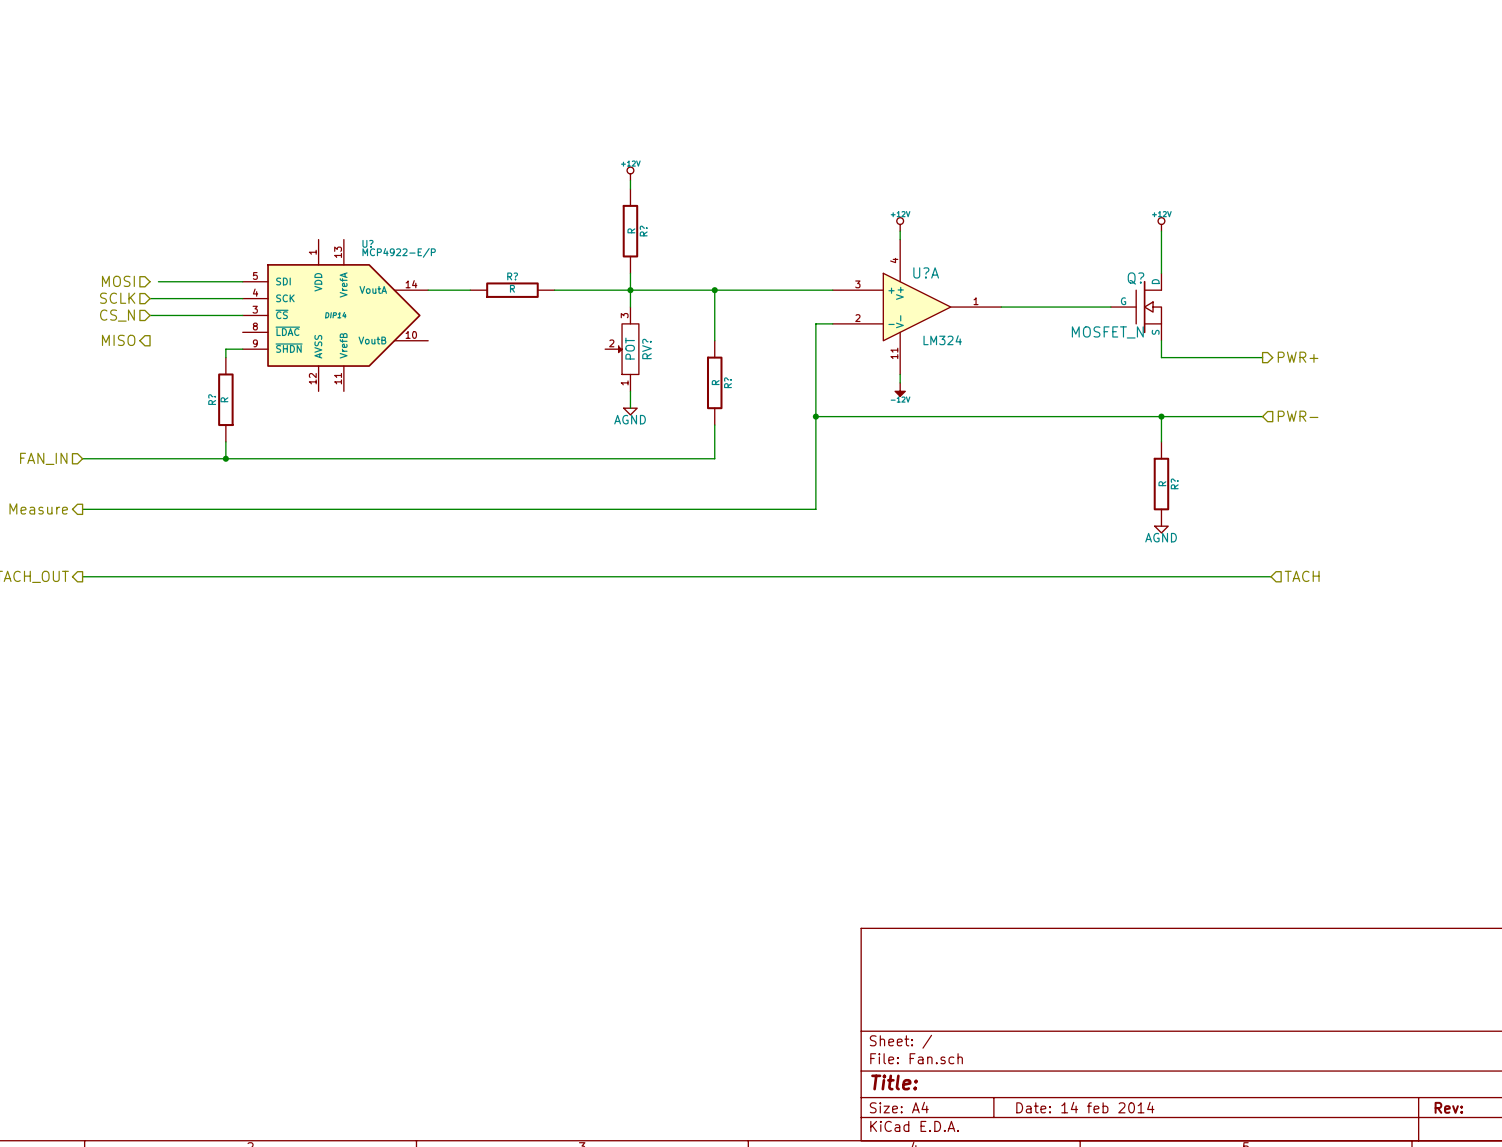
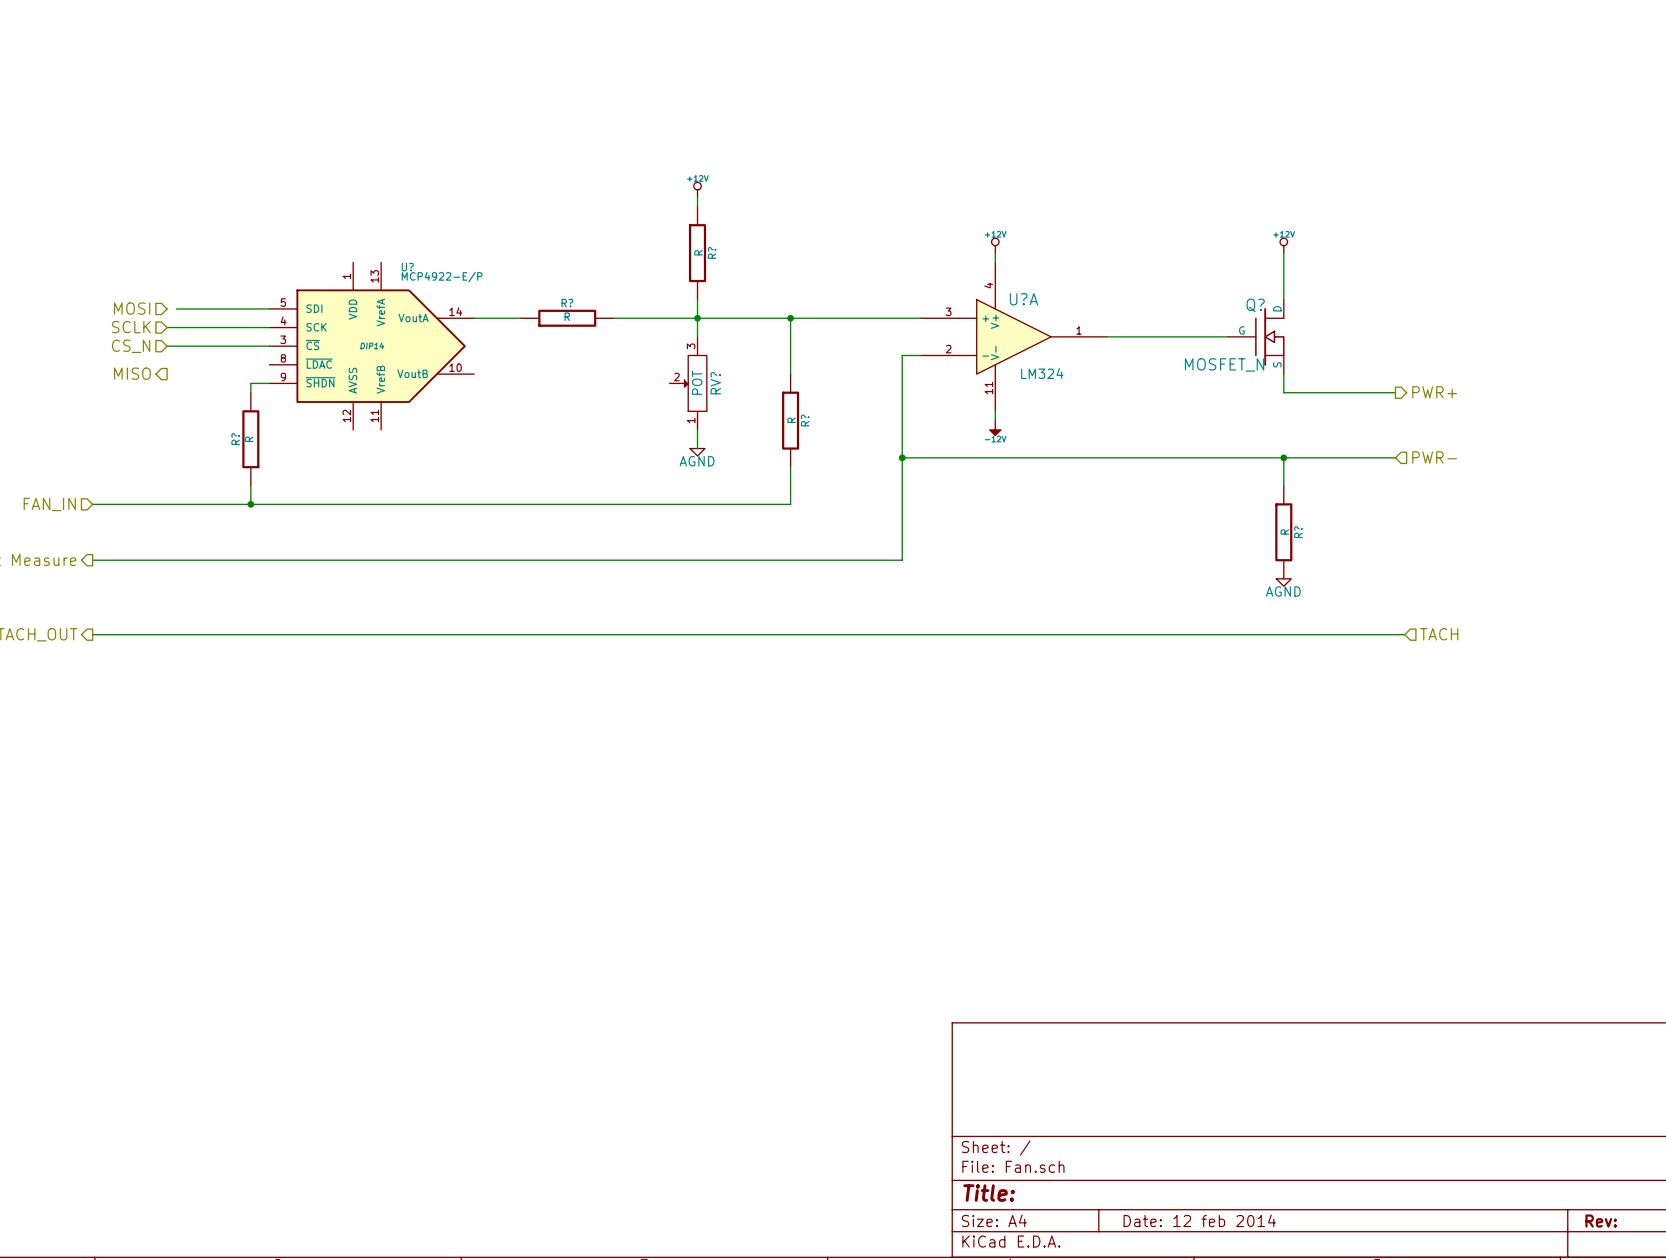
title block: Date: 14 feb 2014 (1085, 1107) -> Date: 12 feb 2014 (1199, 1220)

